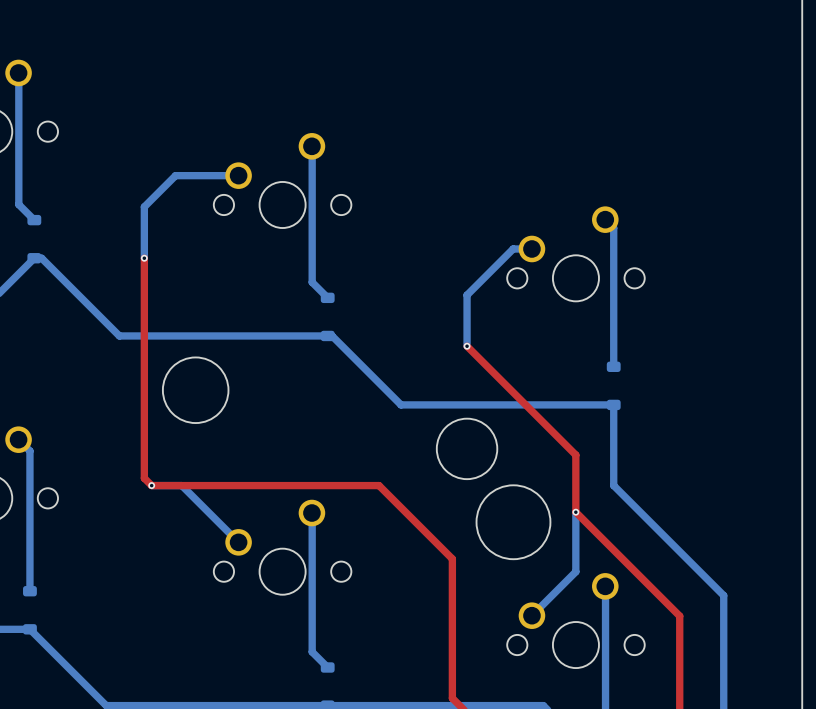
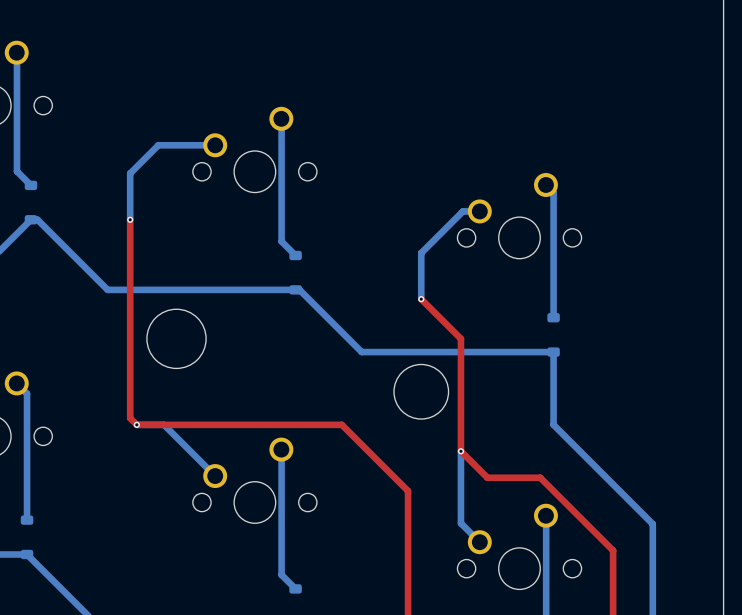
top track: (511, 390) (575, 455) (575, 512) (679, 616) (679, 624) -> (460, 338) (460, 451) (487, 477) (540, 477) (613, 550)
round board edge: [476, 485, 551, 560] -> none
bottom track: (575, 512) (575, 571) (531, 615) -> (460, 451) (460, 523) (479, 542)
via position: (575, 512) -> (460, 451)

